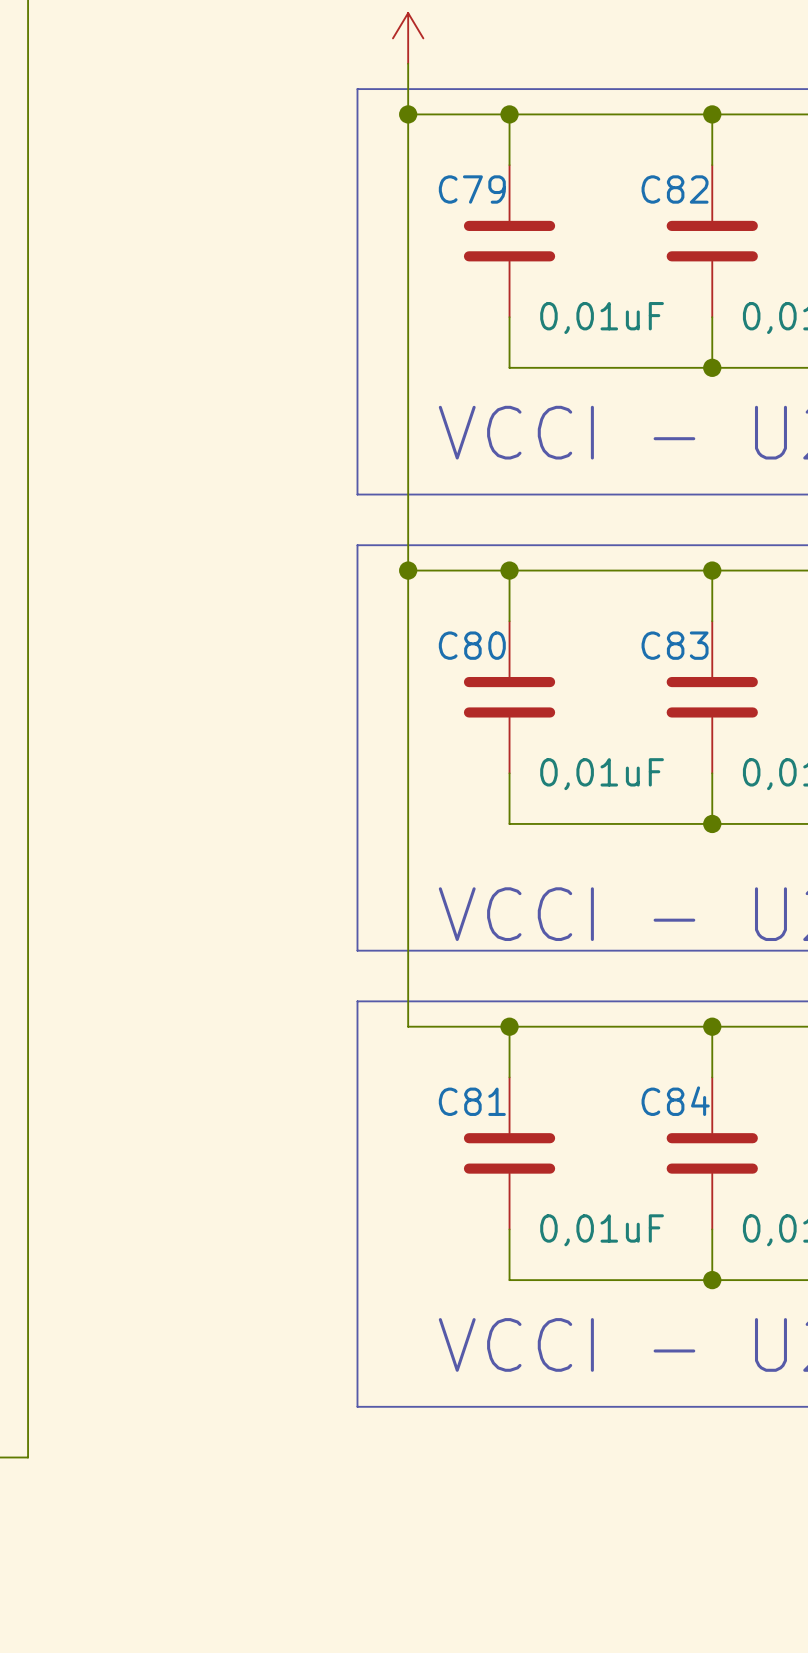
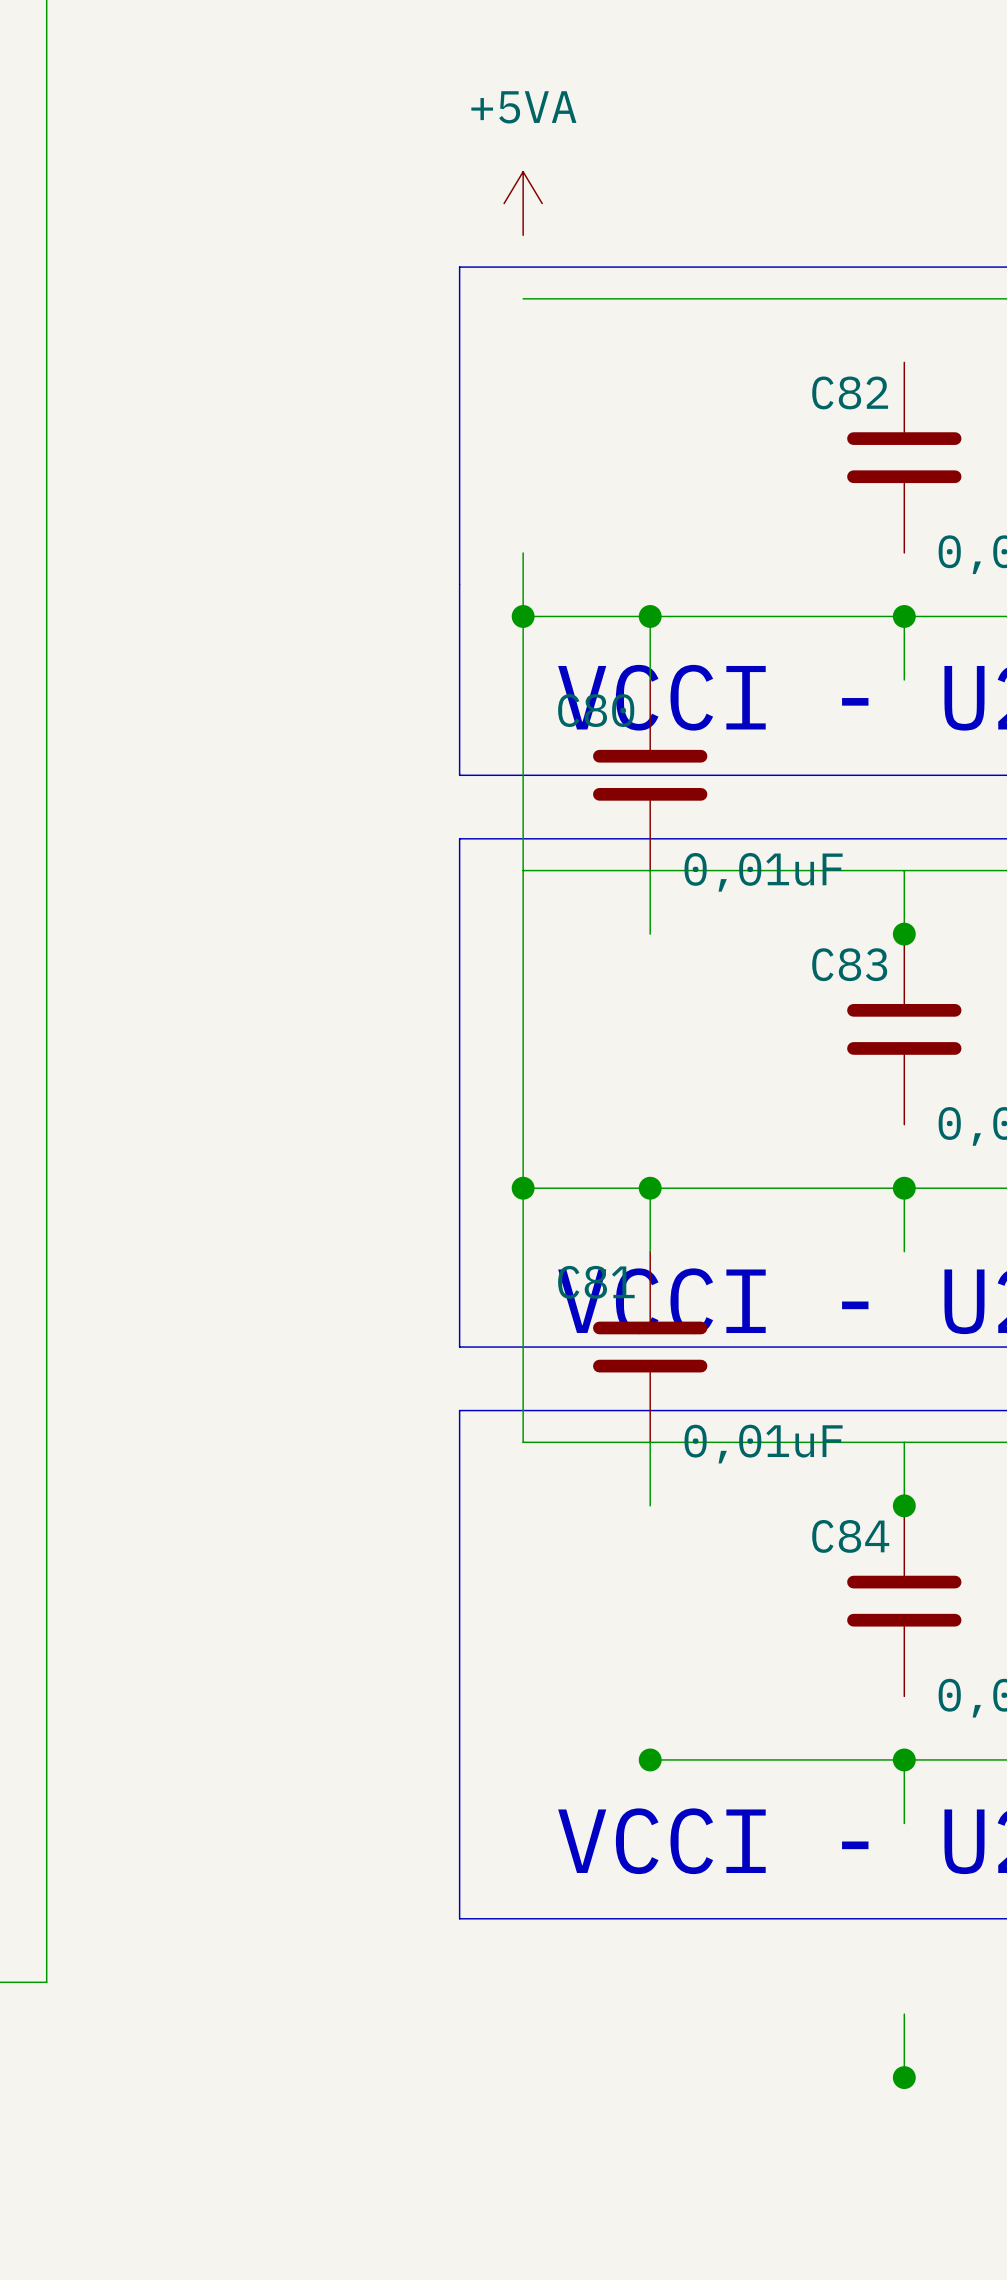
wire: (408, 63) (408, 317) -> none
junction: (408, 114) -> none
wire: (509, 114) (509, 165) -> none
junction: (509, 114) -> none
wire: (712, 114) (712, 165) -> none
junction: (712, 114) -> none
C79: 0,01uF (509, 241) -> none
wire: (509, 317) (509, 367) -> none
wire: (712, 317) (712, 367) -> (904, 680) (904, 616)
wire: none -> (523, 616) (650, 616) (650, 680)
junction: none -> (523, 616)
junction: none -> (650, 616)
junction: (408, 570) -> none
junction: (509, 570) -> none
junction position: (712, 570) -> (904, 934)
C80 position: (509, 697) -> (650, 775)
wire: (509, 773) (509, 823) -> none
wire: (712, 773) (712, 823) -> (904, 1251) (904, 1188)
wire: none -> (523, 1188) (650, 1188) (650, 1251)
junction: none -> (523, 1188)
junction: none -> (650, 1188)
junction: (509, 1026) -> none
junction position: (712, 1026) -> (904, 1505)
C81 position: (509, 1153) -> (650, 1347)
wire: (509, 1229) (509, 1280) -> (904, 2014) (904, 2077)
wire: (712, 1229) (712, 1280) -> (904, 1823) (904, 1759)
junction: none -> (650, 1759)
junction: none -> (904, 2077)

